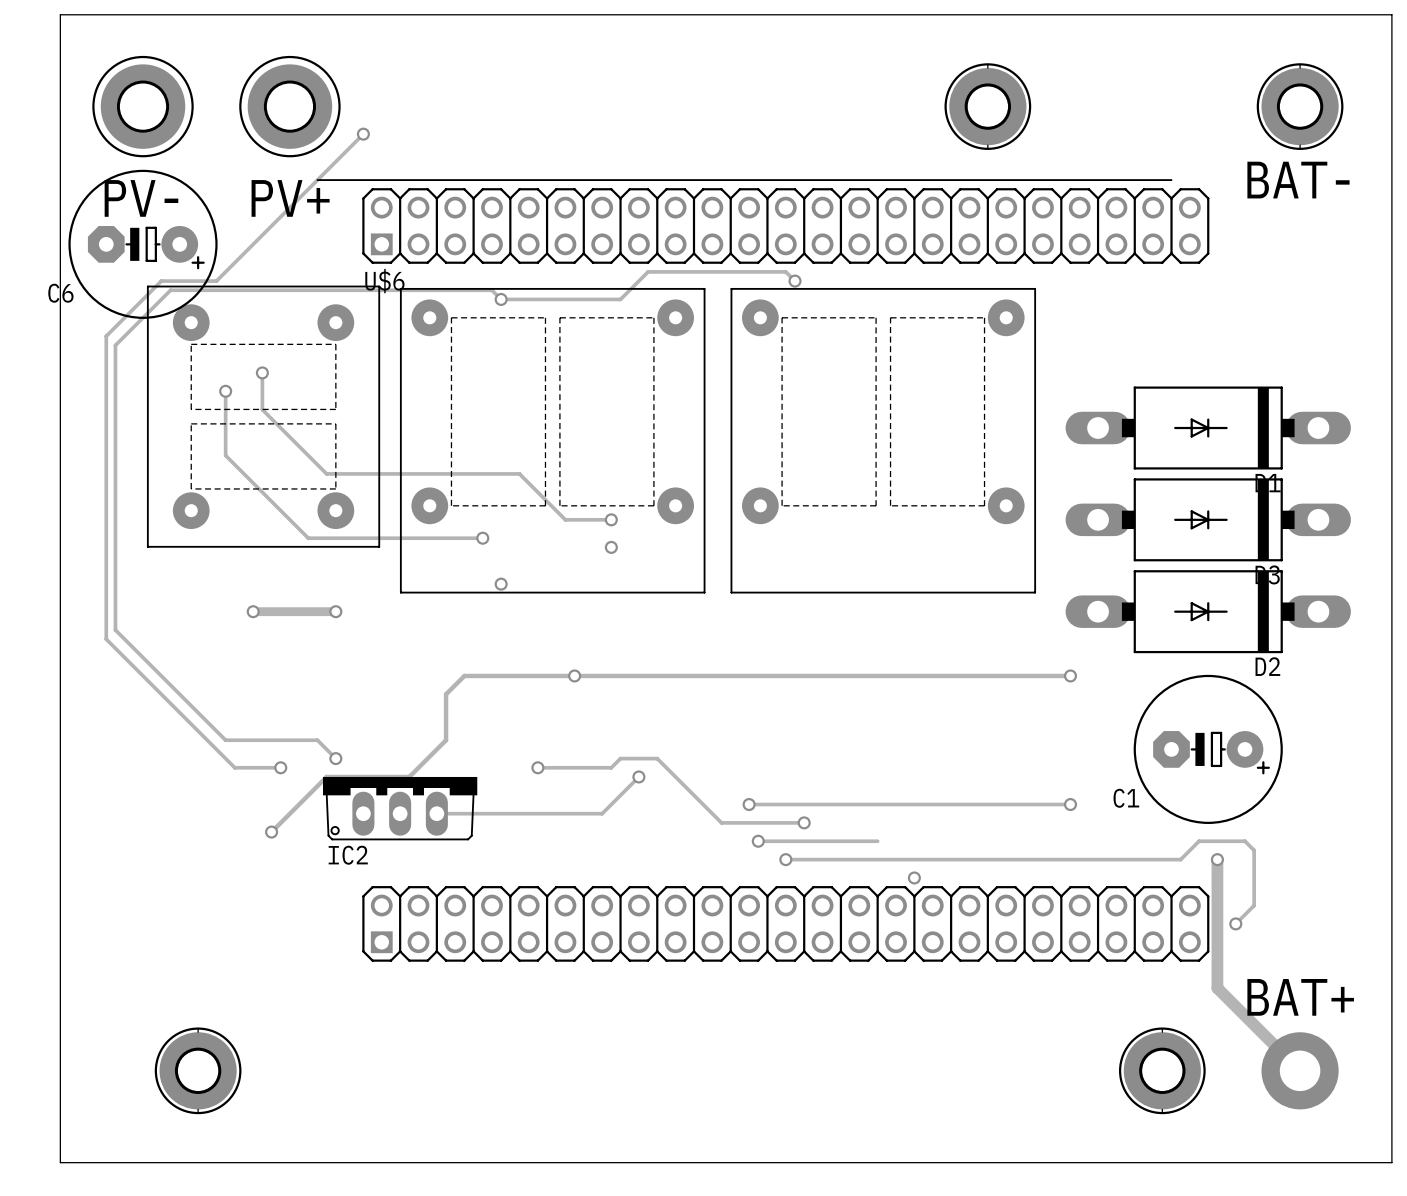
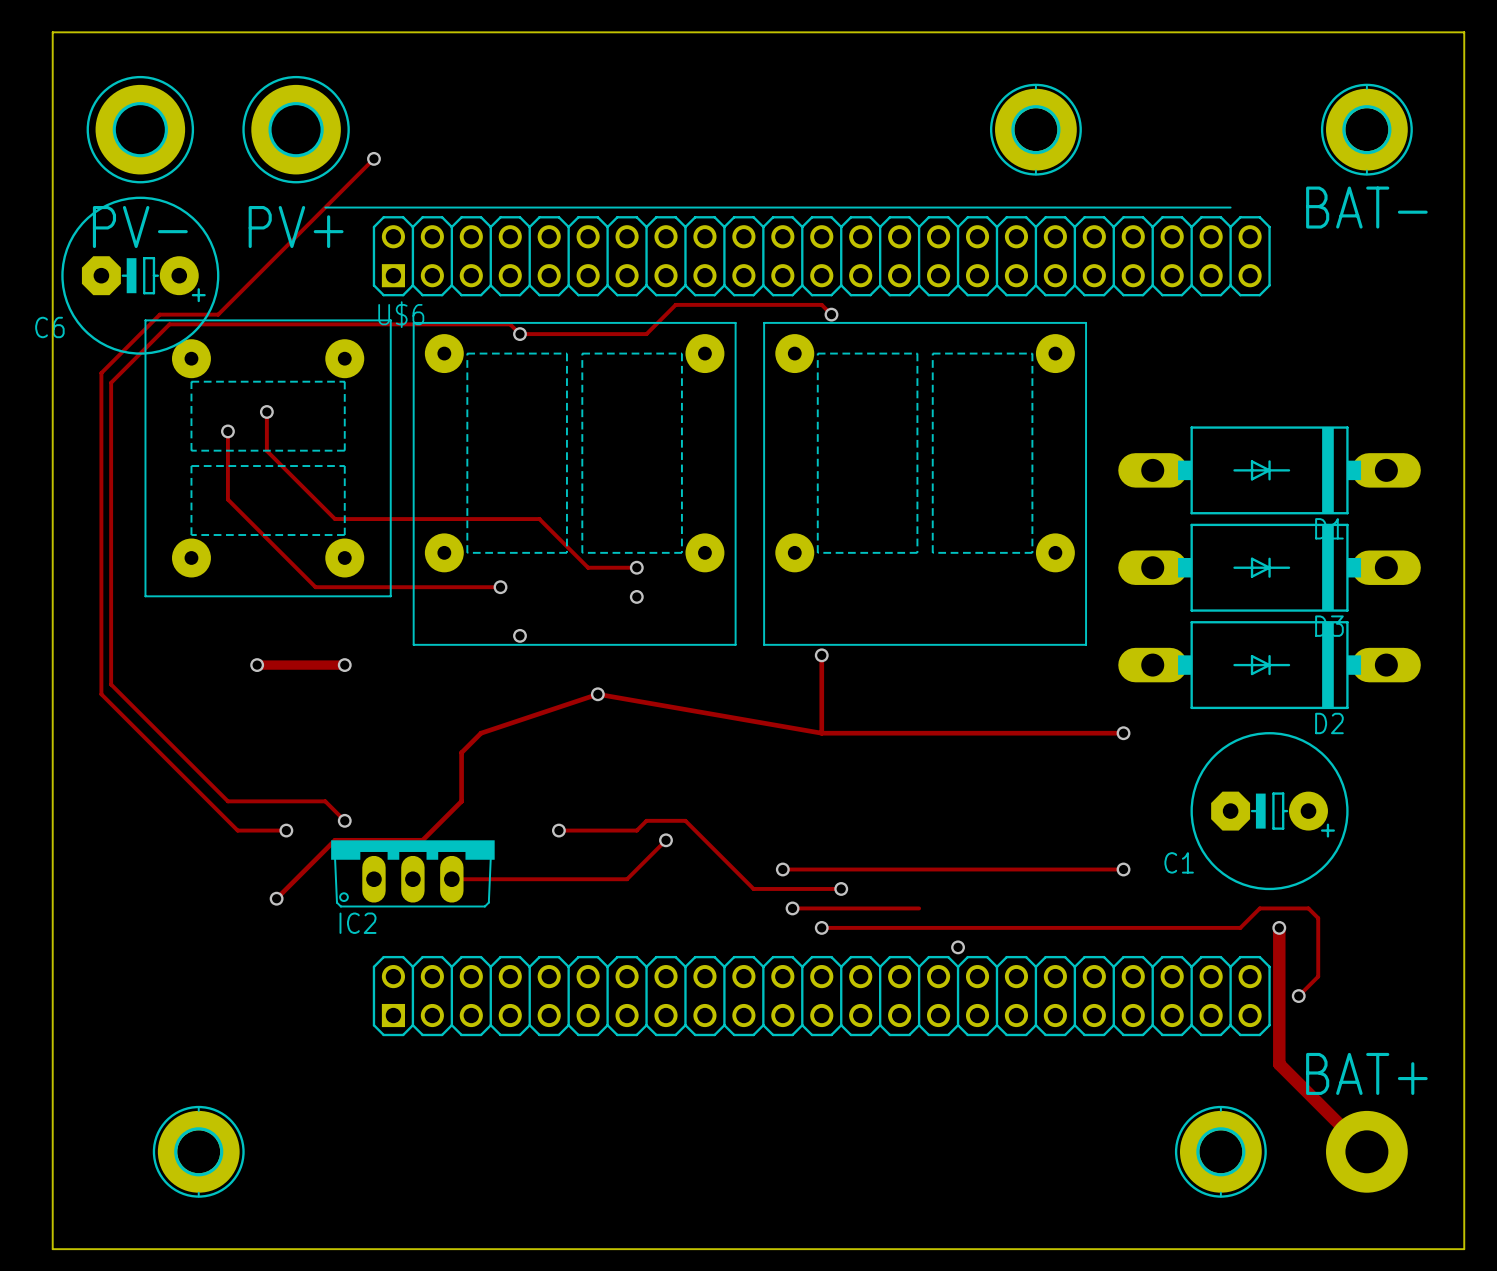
via: none -> (821, 655)
track: (464, 675) (785, 675) -> (481, 733) (597, 694) (821, 733) (821, 655)
via position: (574, 675) -> (597, 694)

